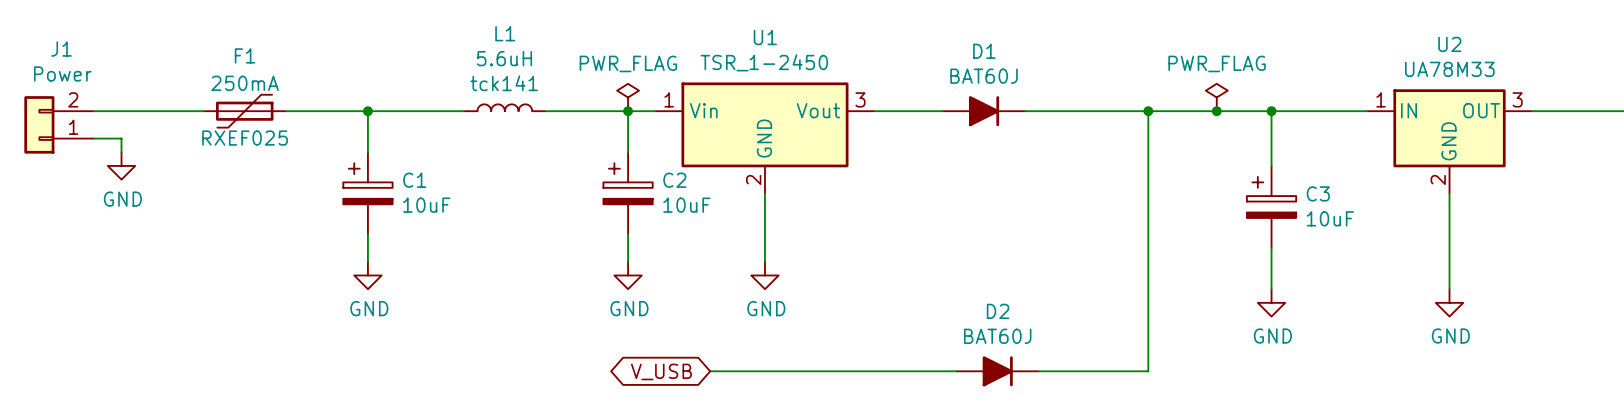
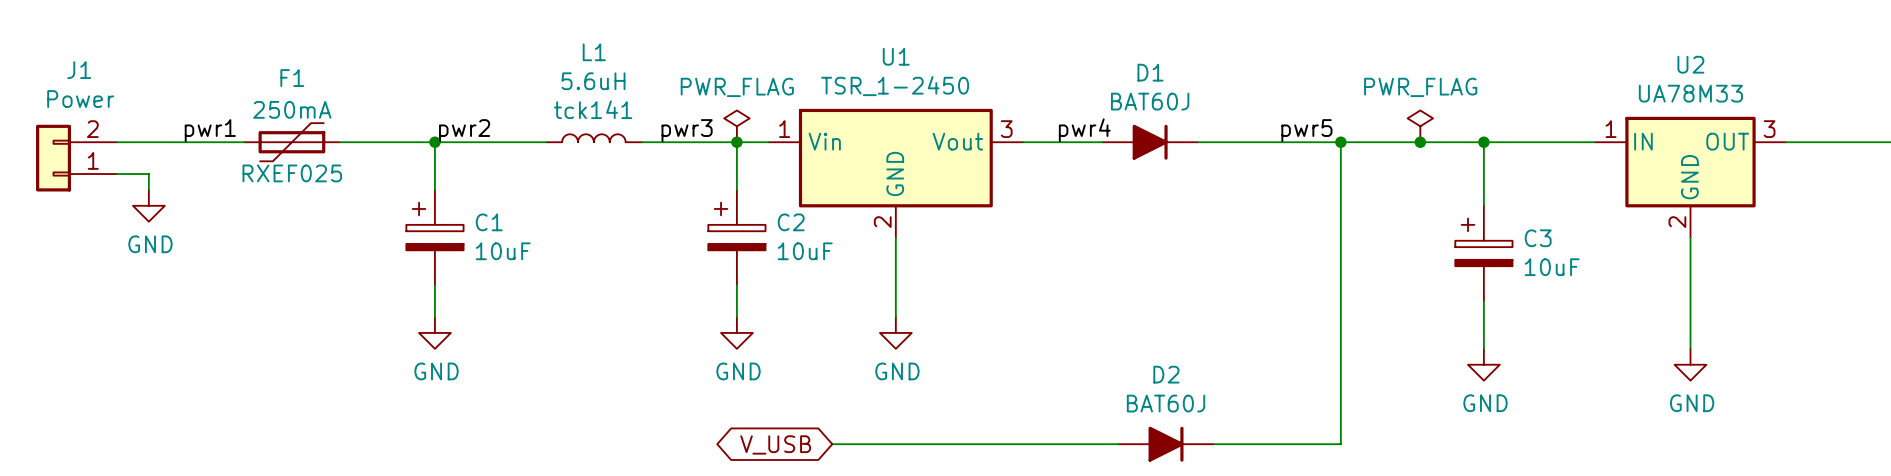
label: none -> pwr4 (1084, 130)
label: none -> pwr1 (210, 130)
label: none -> pwr2 (464, 130)
label: none -> pwr3 (687, 130)
label: none -> pwr5 (1306, 130)

